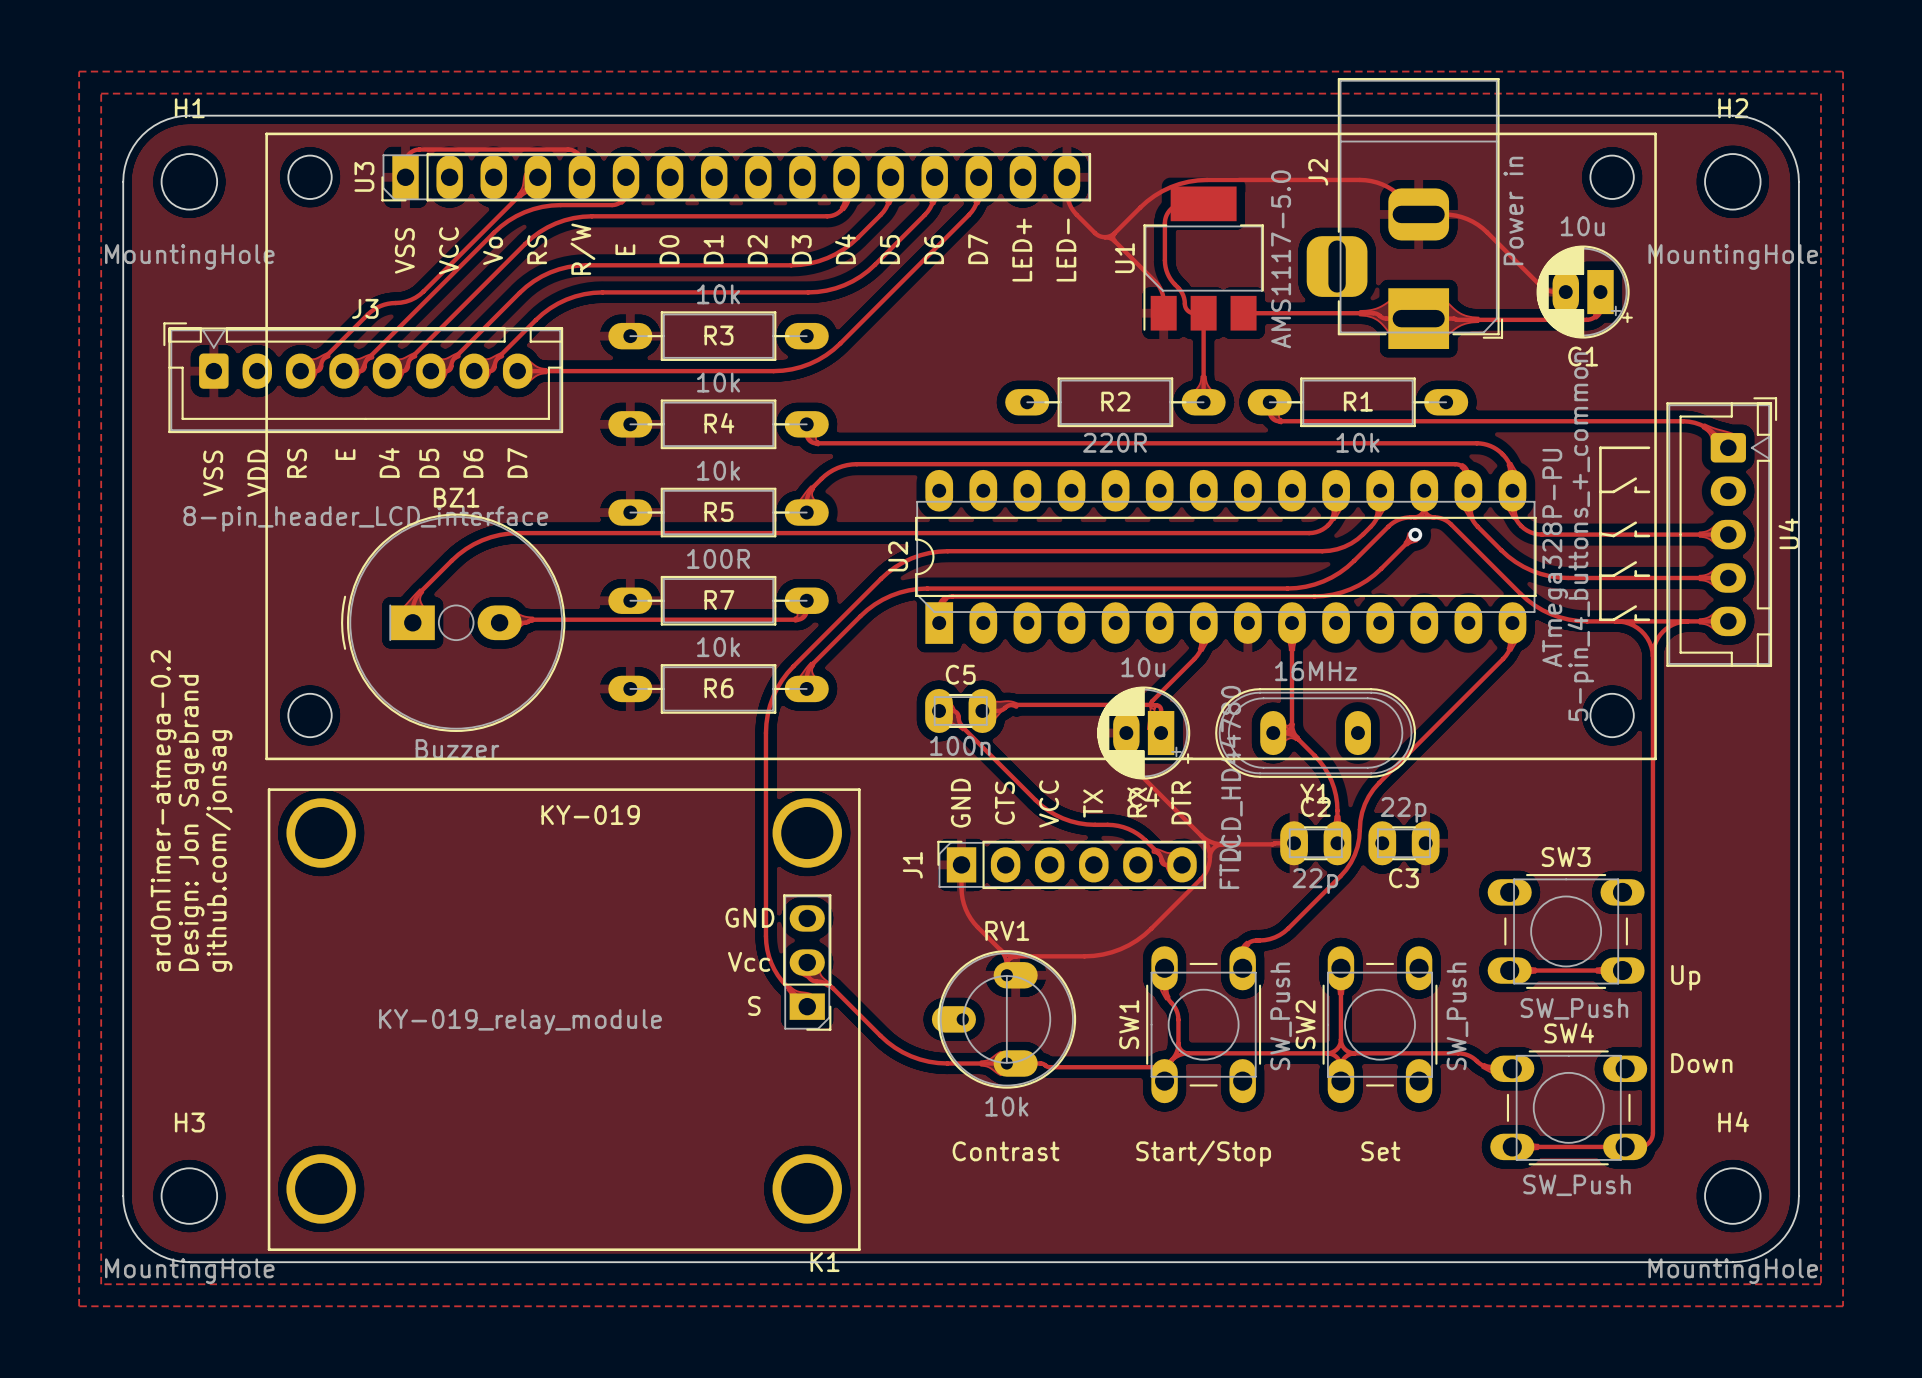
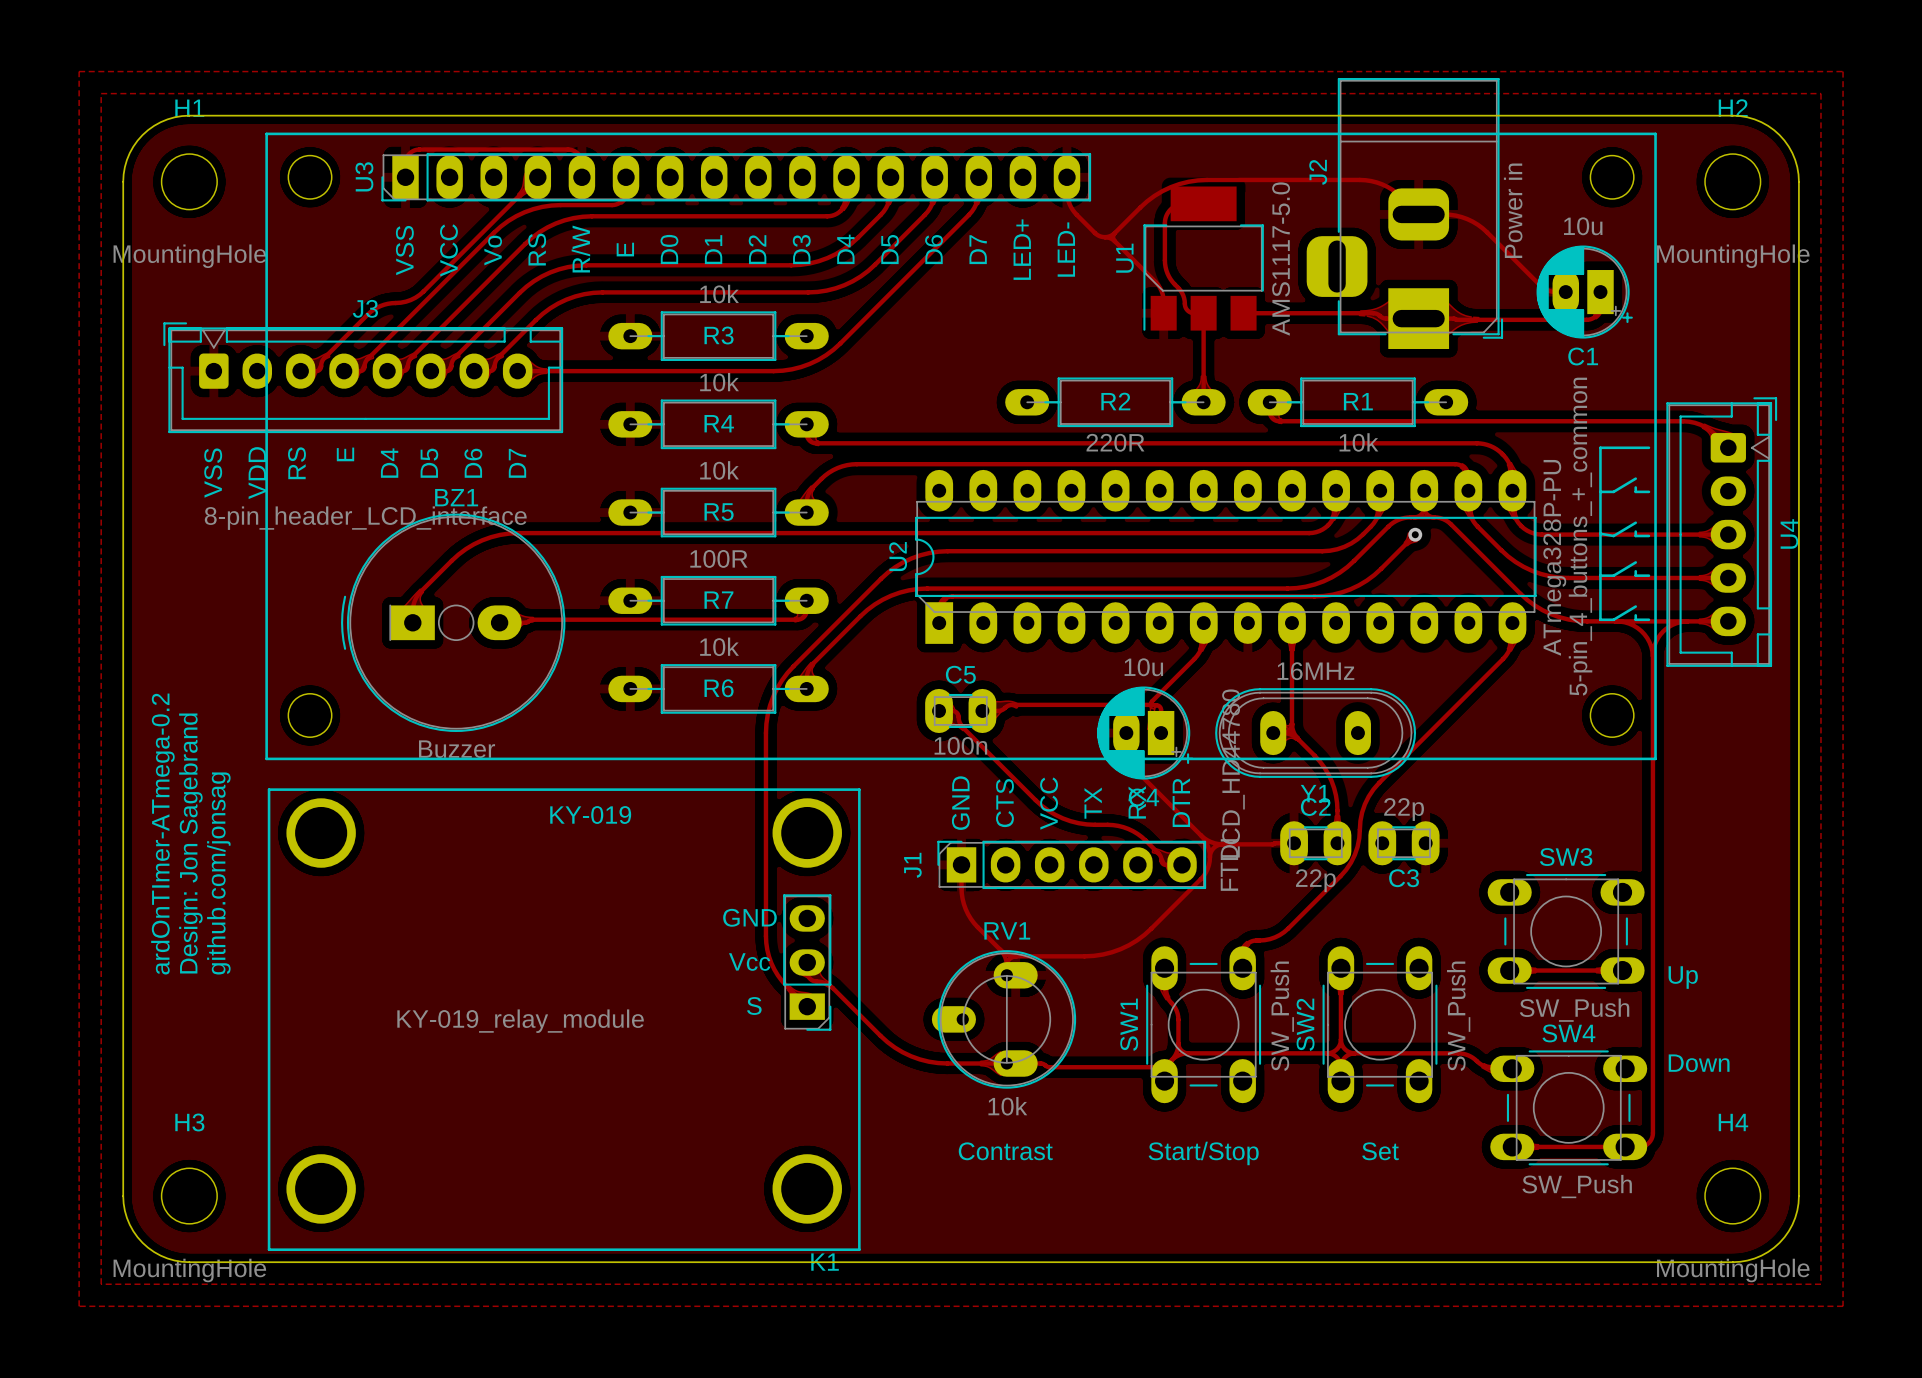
text: ardOnTimer-atmega-0.2 (163, 810) -> ardOnTImer-ATmega-0.2 (162, 834)

